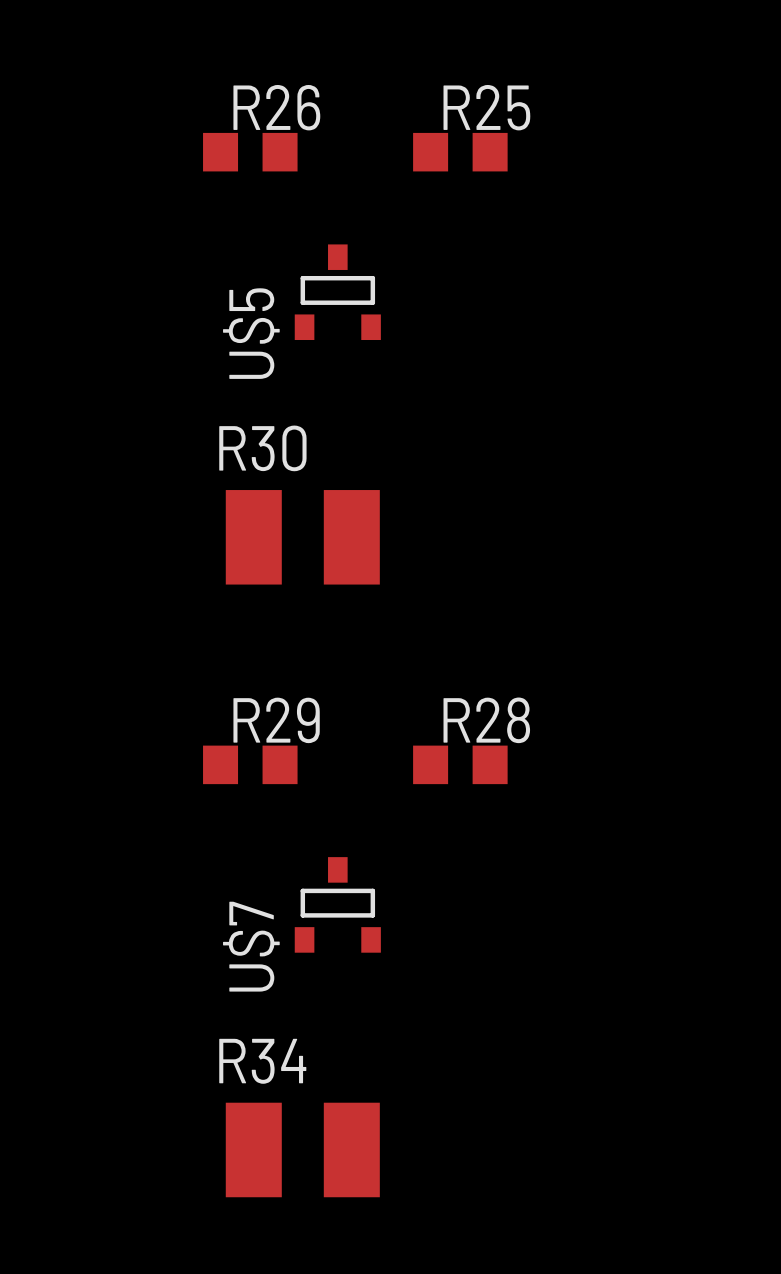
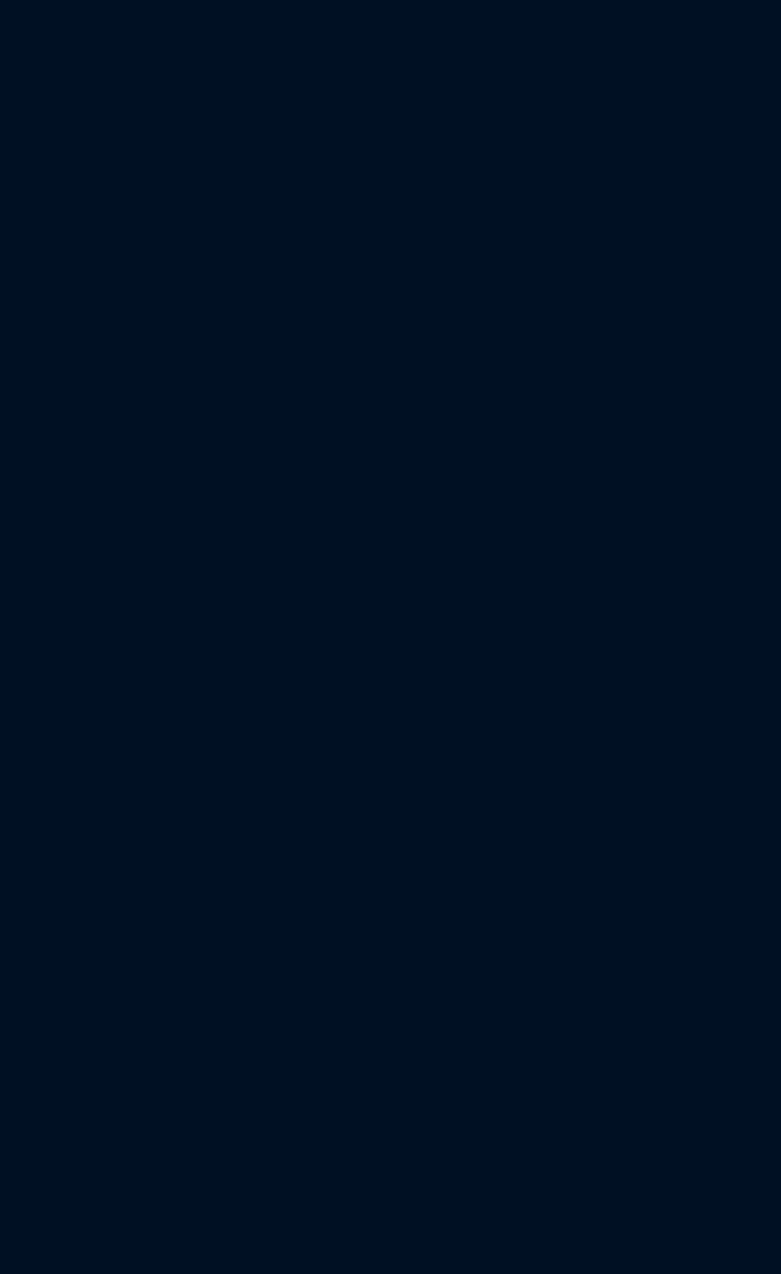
R26: (250, 152) -> none
R25: (460, 152) -> none
U$5: (337, 292) -> none
R30: (302, 537) -> none
R29: (250, 764) -> none
R28: (460, 764) -> none
U$7: (337, 904) -> none
R34: (302, 1149) -> none

